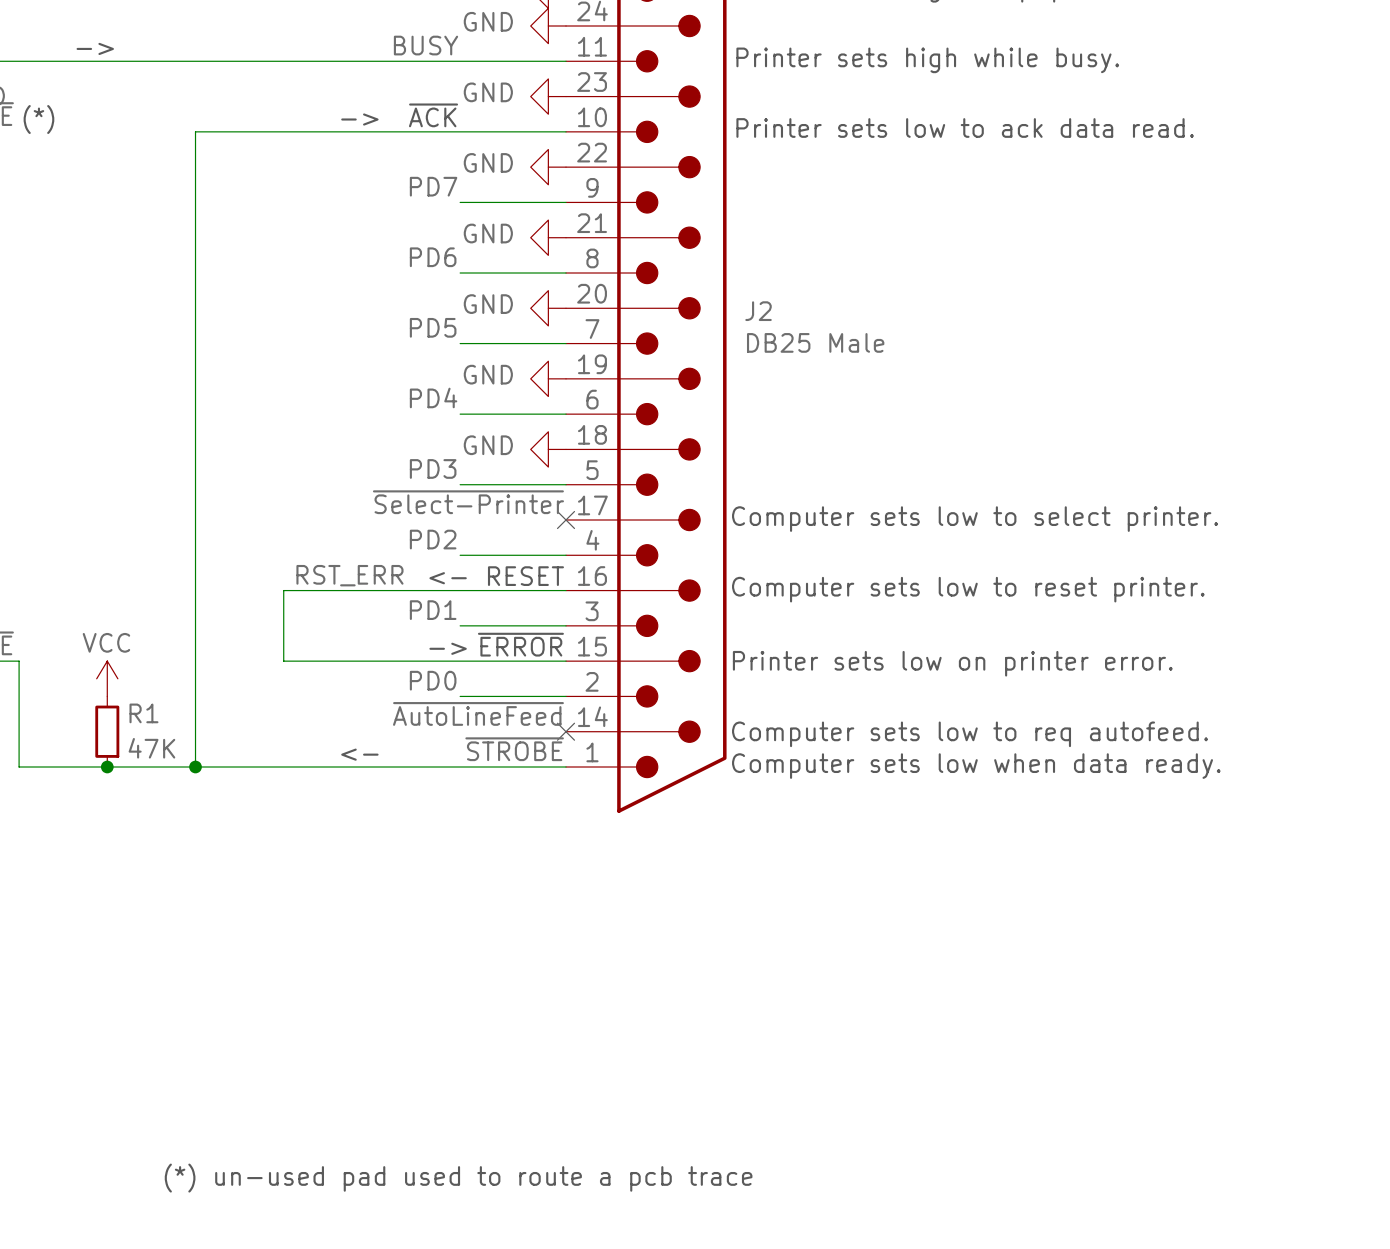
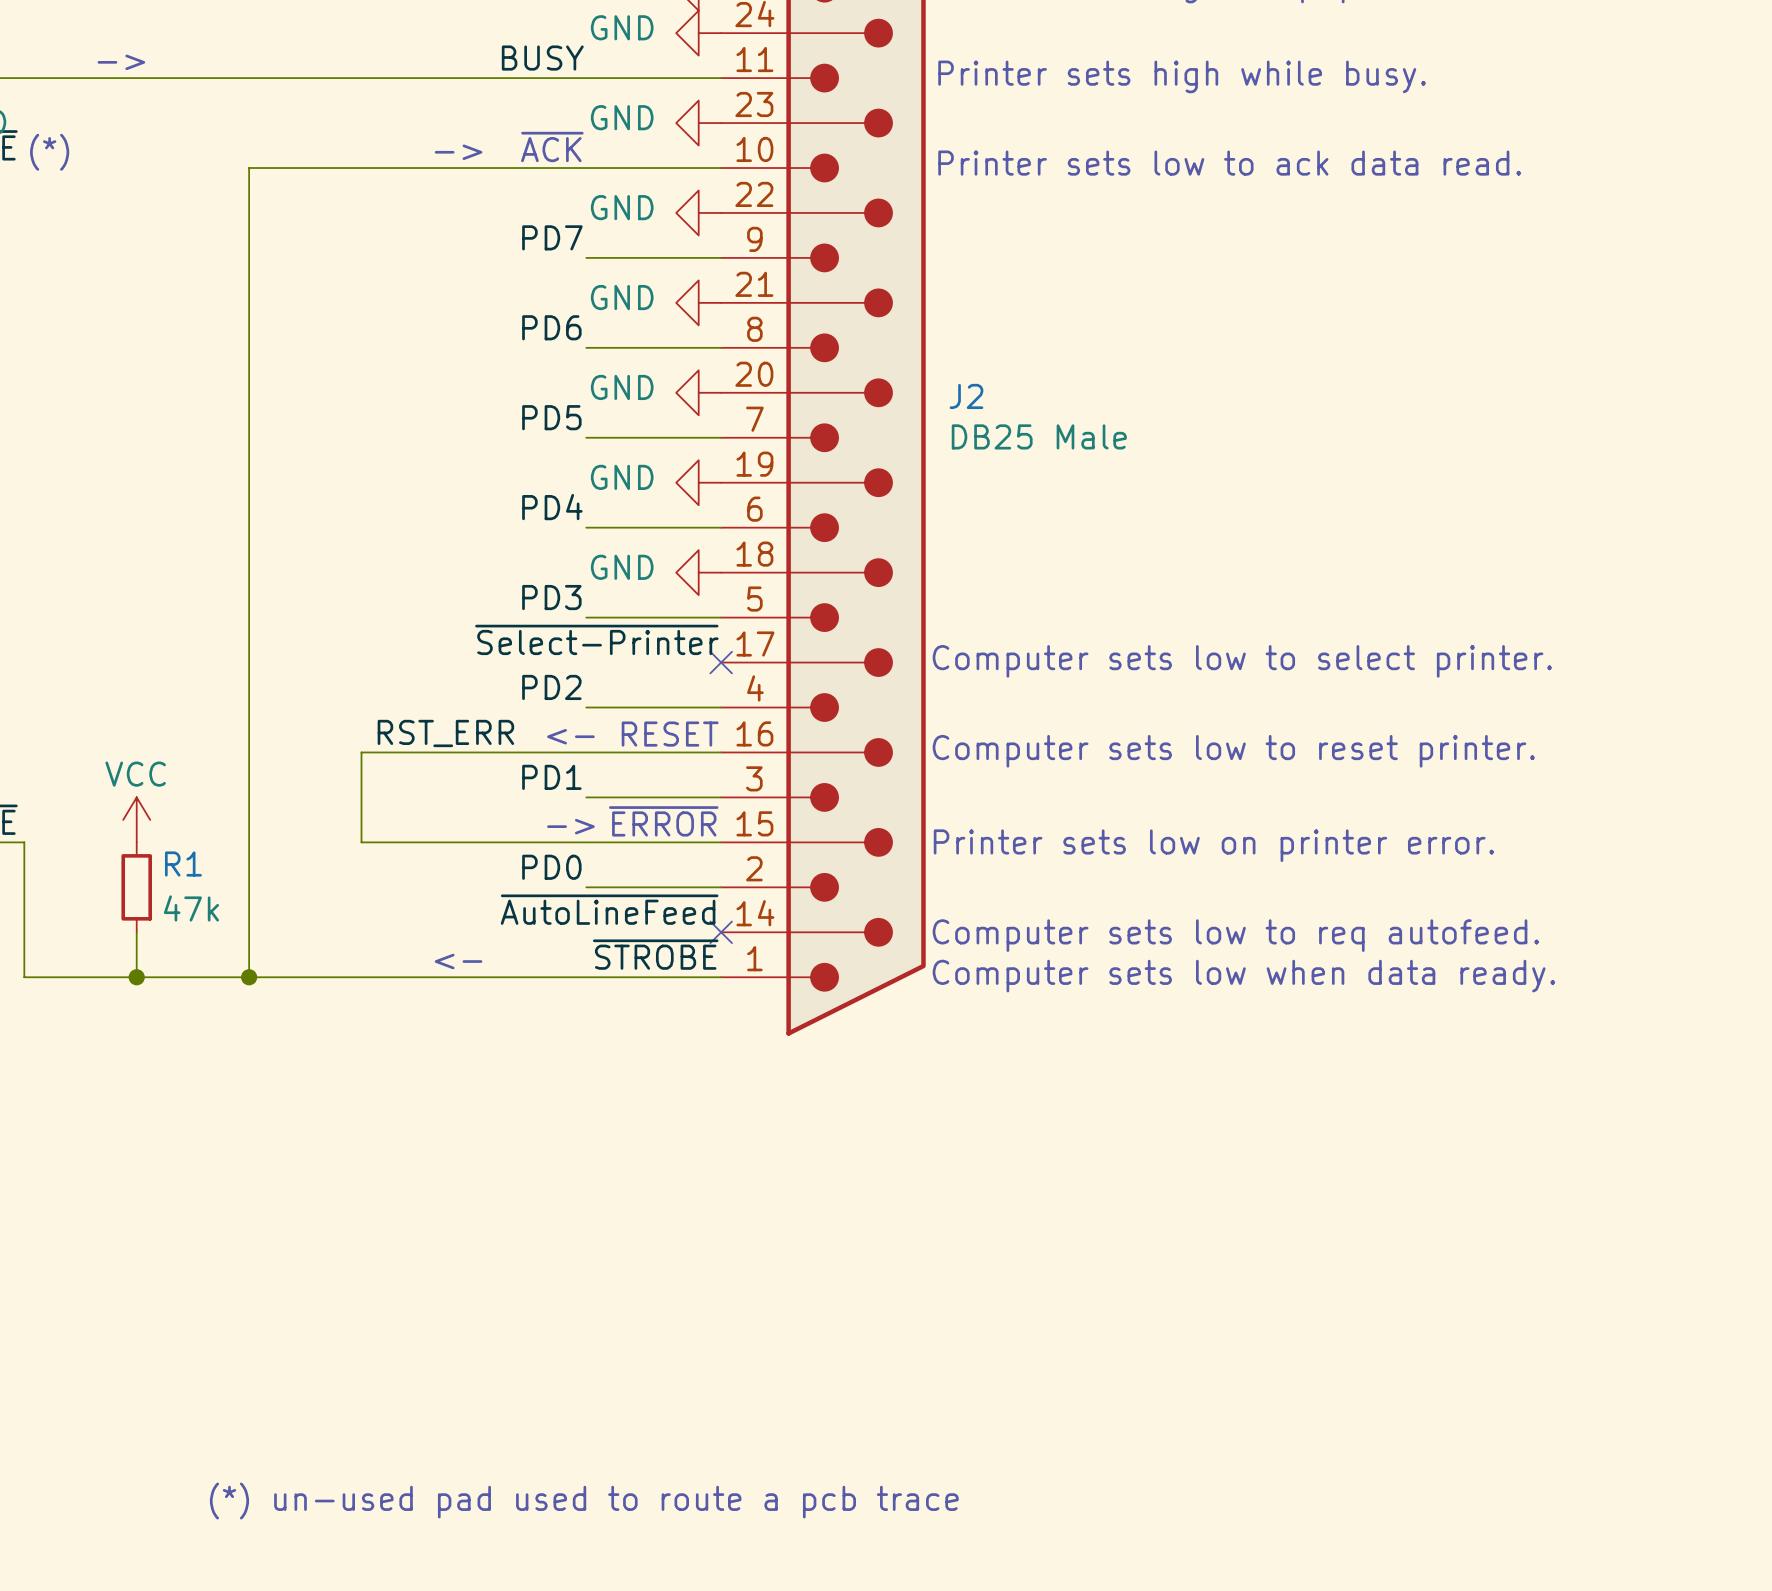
power symbol position: VCC (107, 678) -> VCC (136, 819)
wire: none -> (136, 932) (136, 977)
R1 position: (107, 731) -> (136, 887)
R1 value: 47K (151, 748) -> 47k (191, 908)

